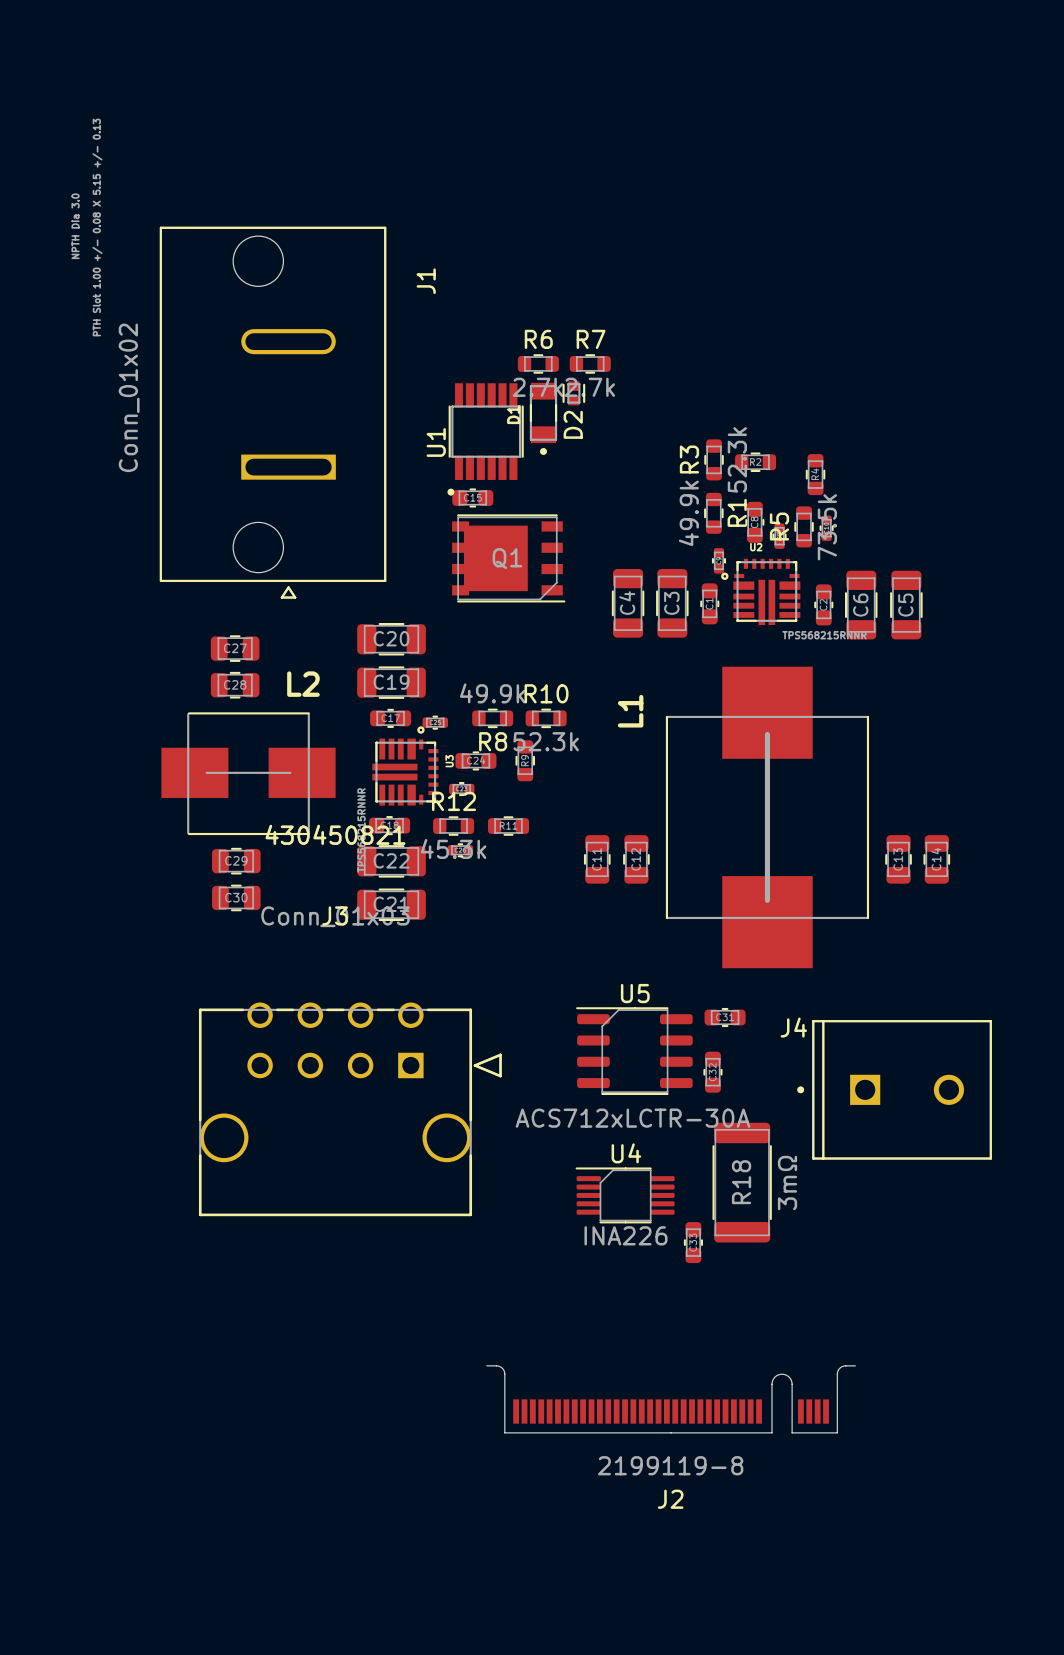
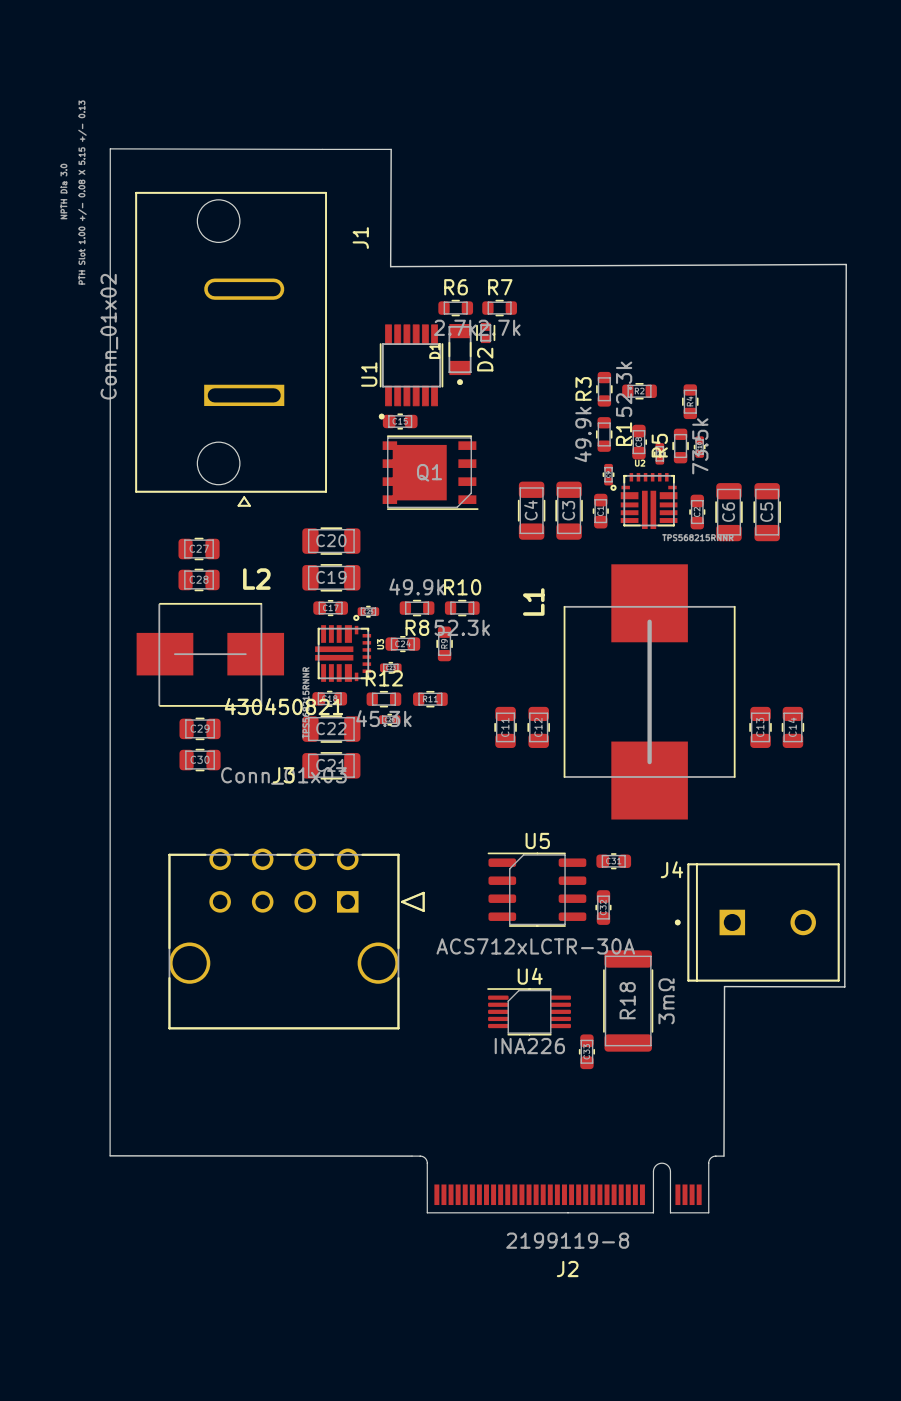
board edge: none -> (412, 1156) (110, 1155) (110, 148) (391, 149) (390, 266) (846, 264) (844, 986) (724, 986) (723, 1156)

